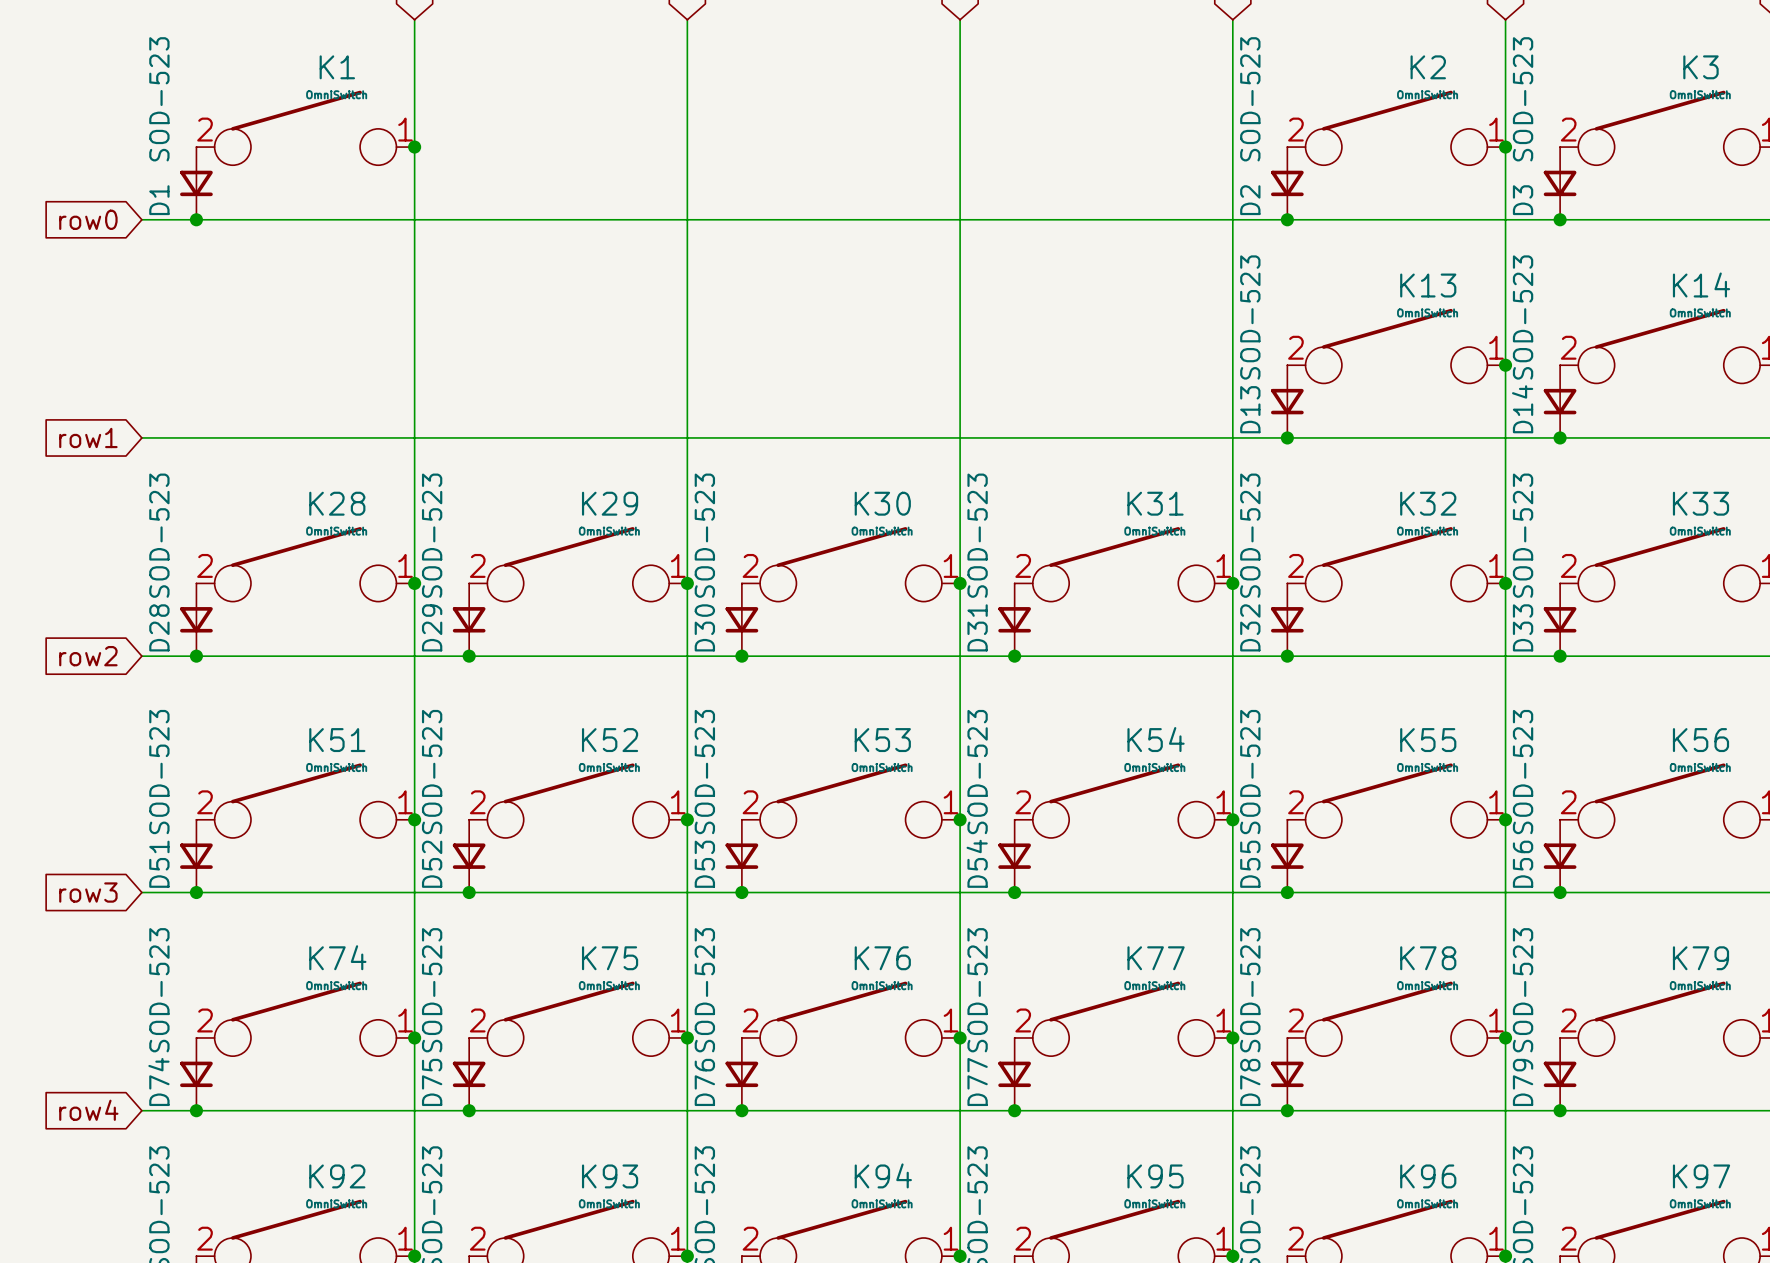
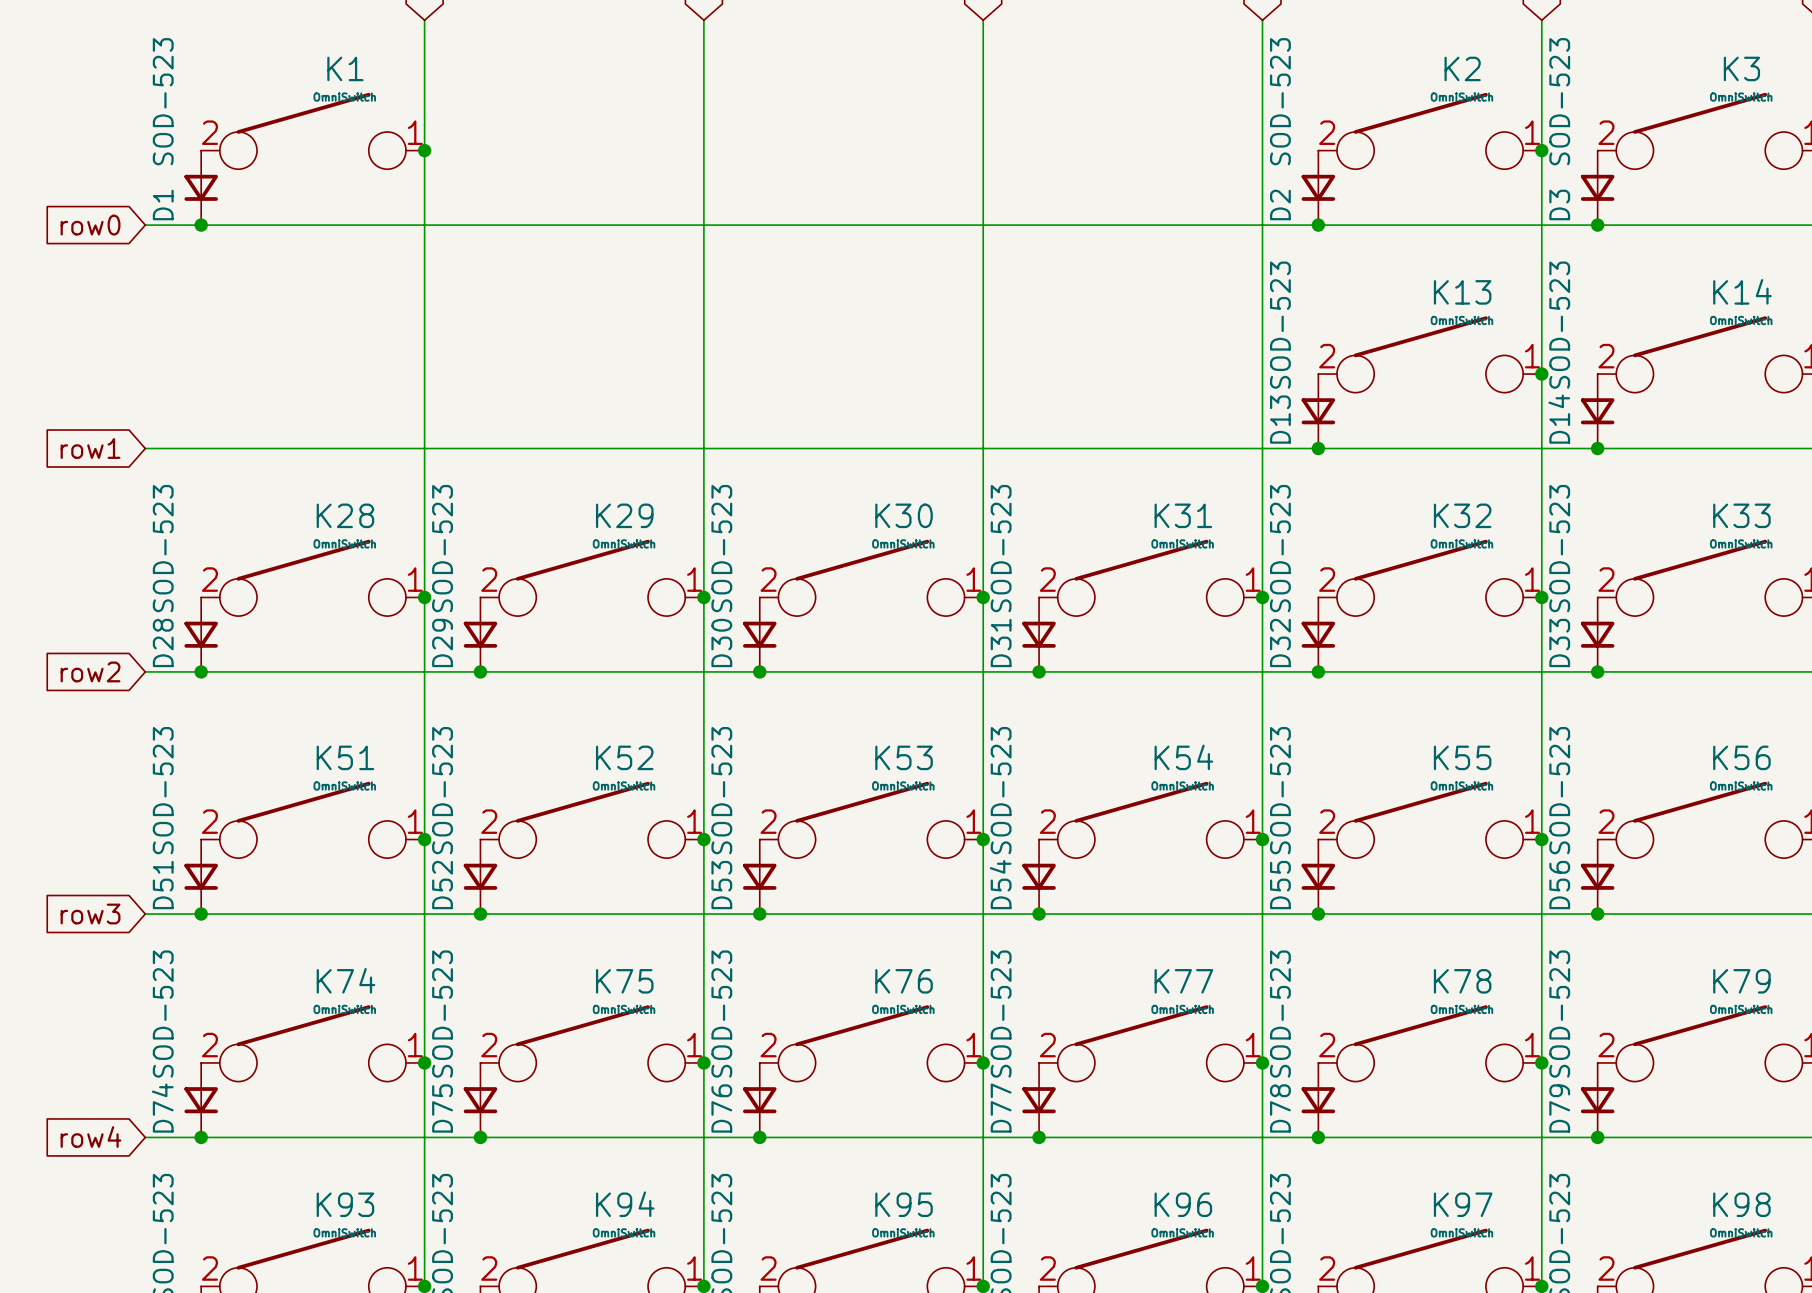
K94 name: K94 (883, 1175) -> K95 (904, 1204)
K92 name: K92 (337, 1176) -> K93 (345, 1204)
K93 name: K93 (610, 1176) -> K94 (625, 1204)
K95 name: K95 (1155, 1176) -> K96 (1183, 1204)
K96 name: K96 (1428, 1176) -> K97 (1463, 1204)
K97 name: K97 (1701, 1176) -> K98 (1741, 1204)

